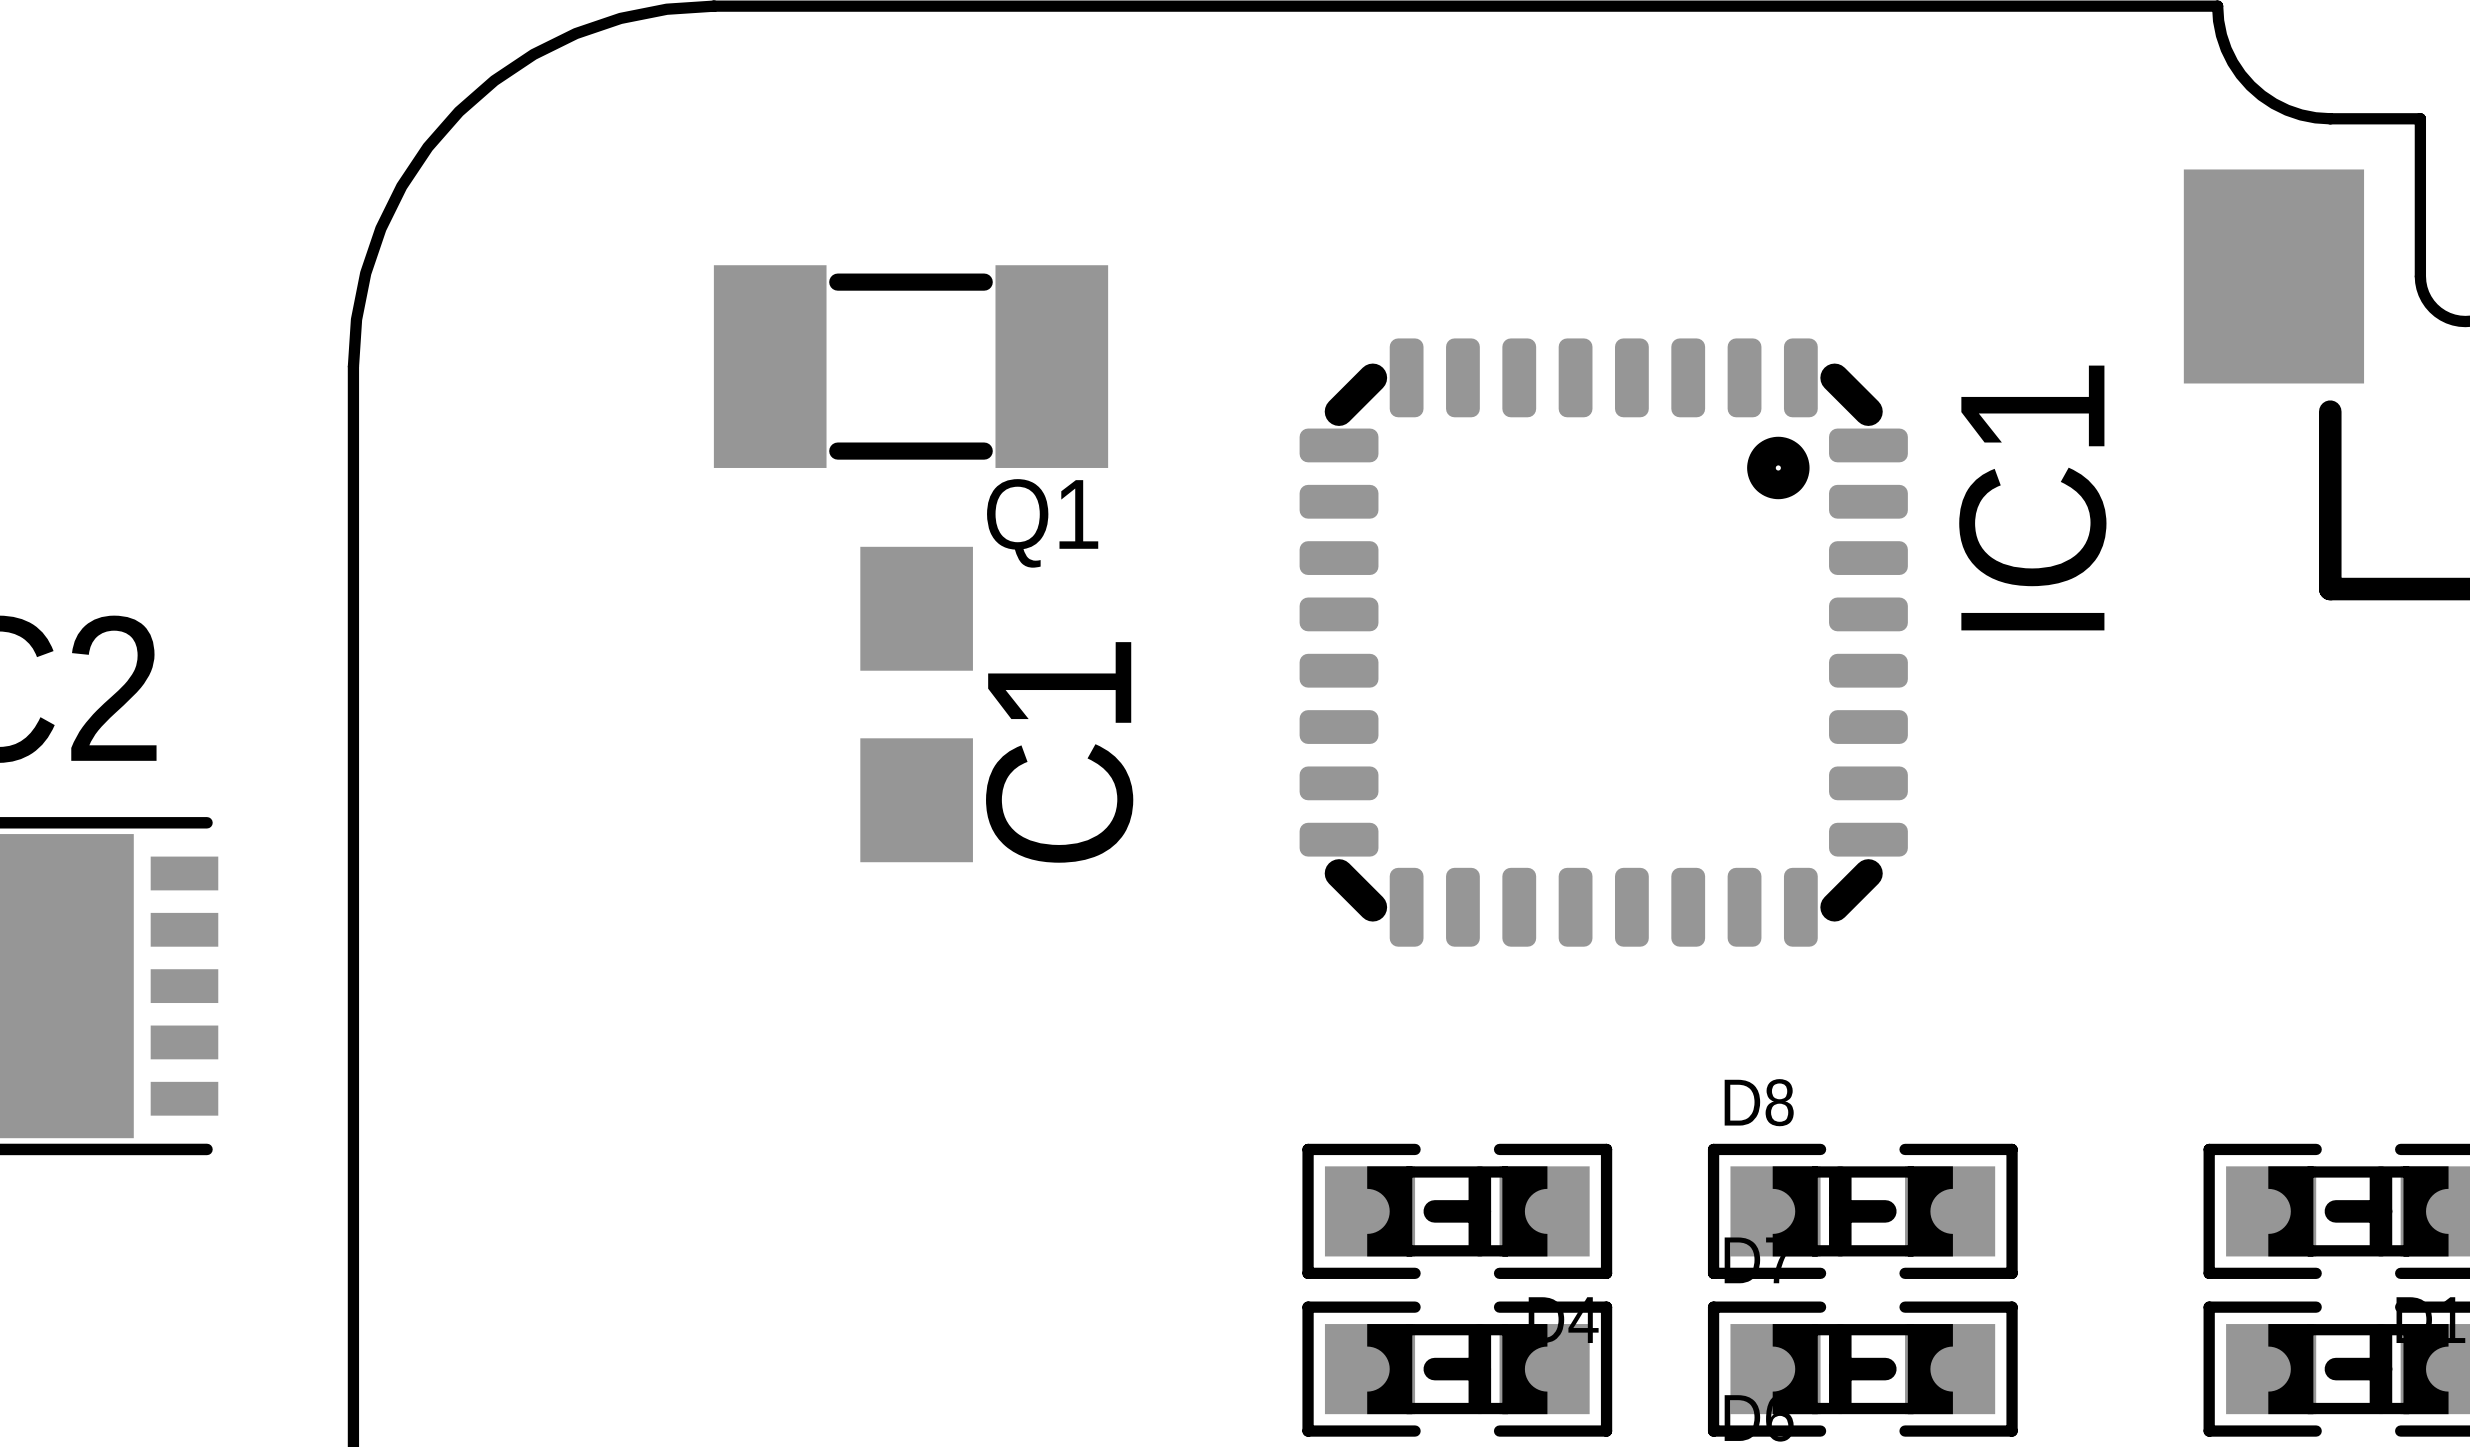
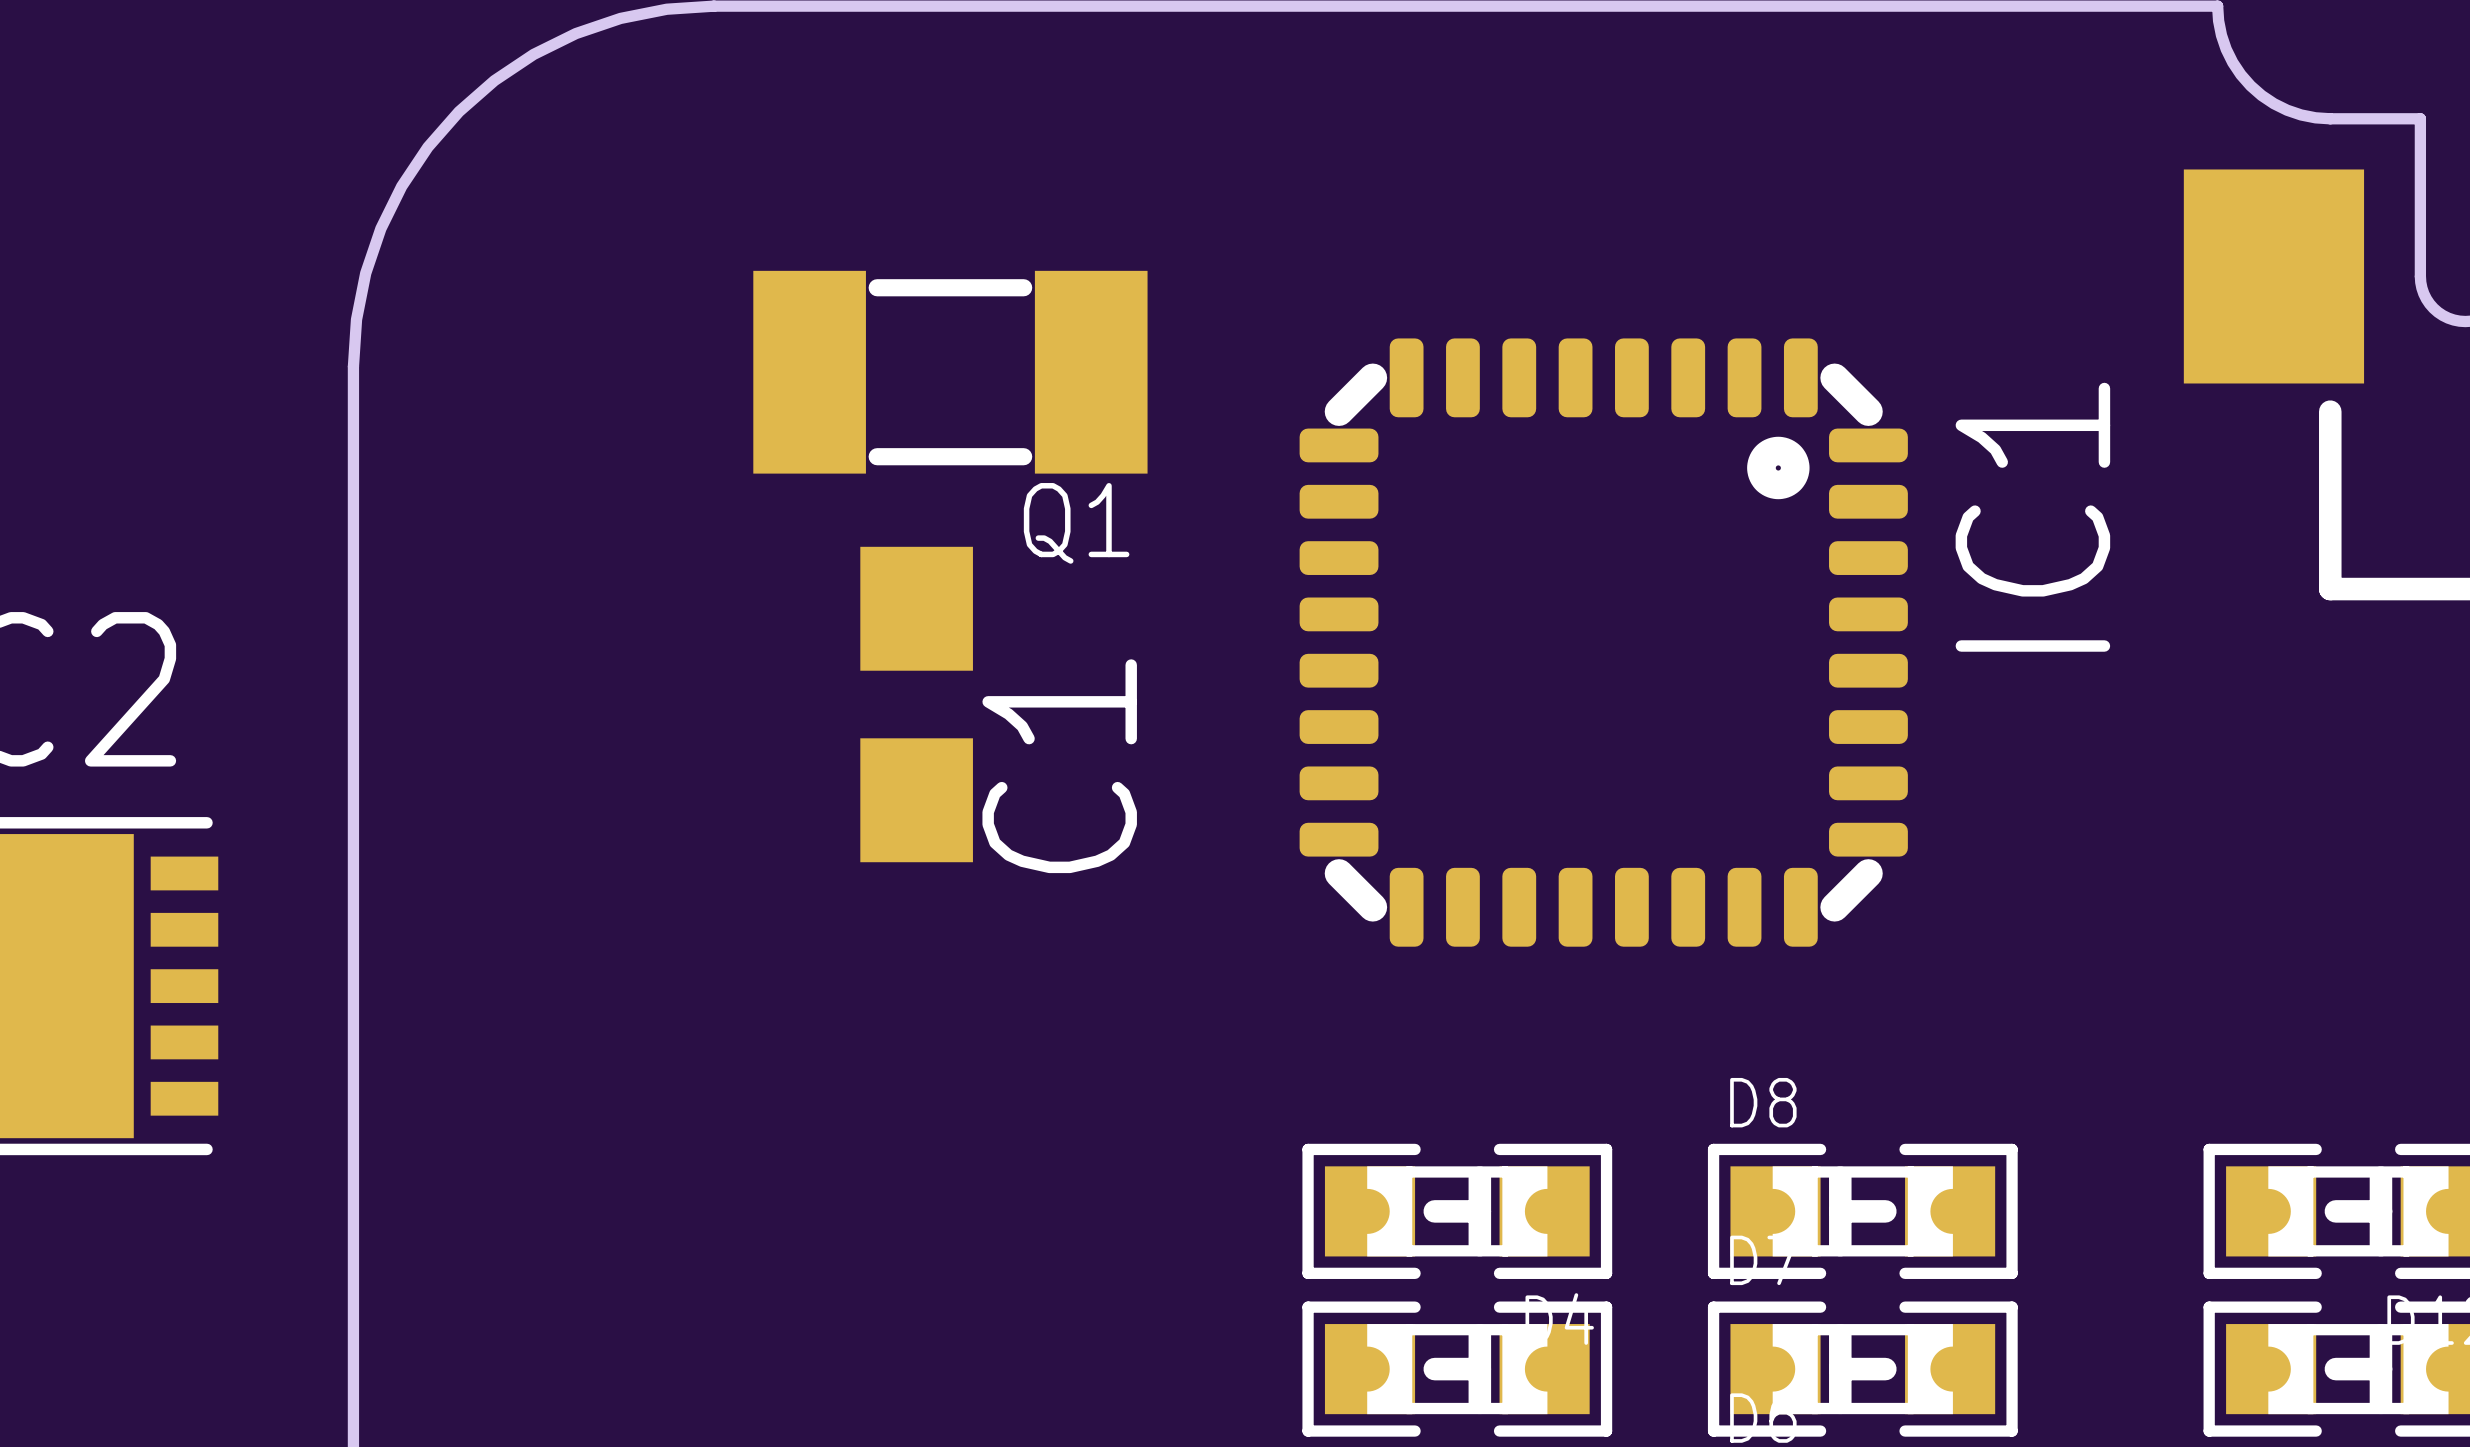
Q1 position: (911, 366) -> (950, 372)

